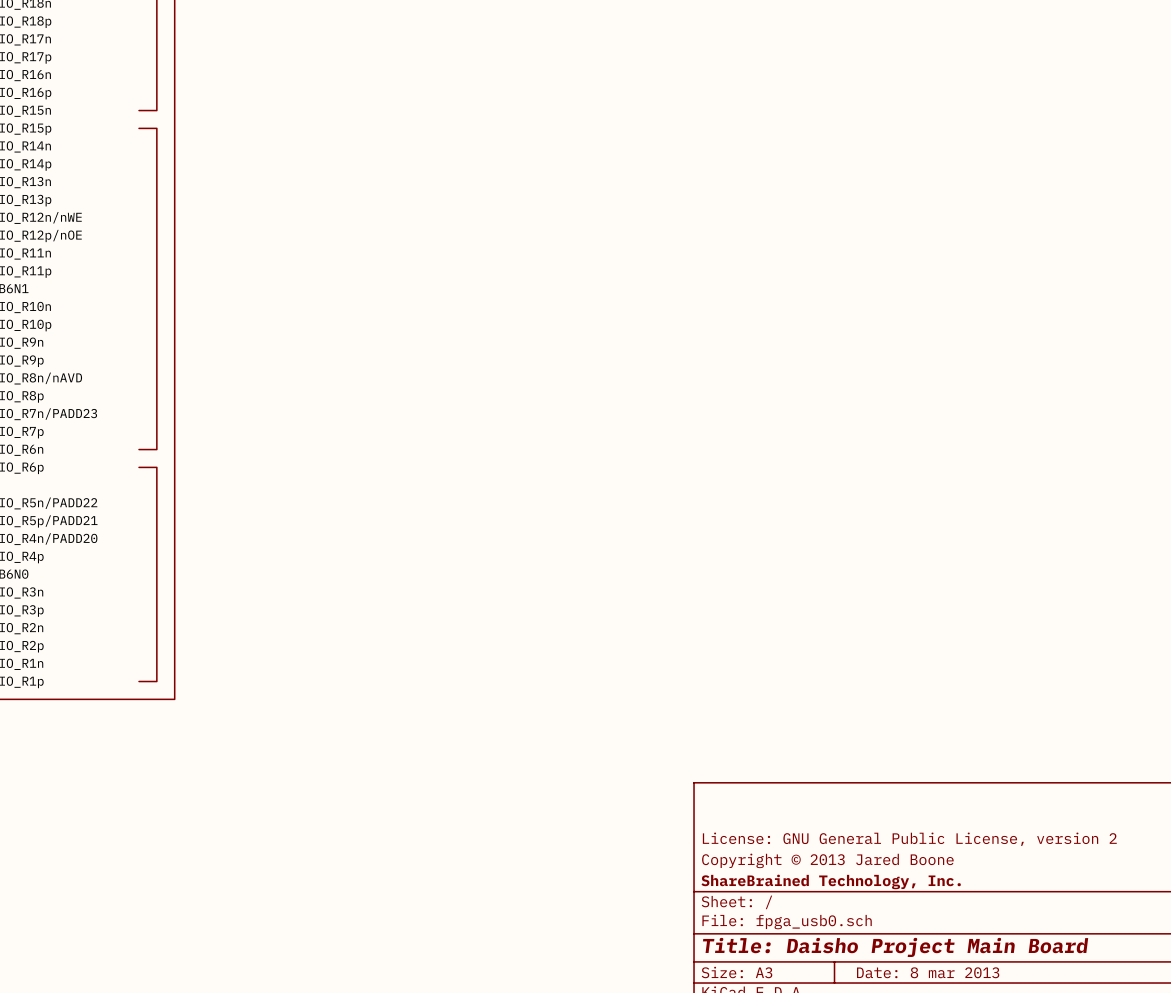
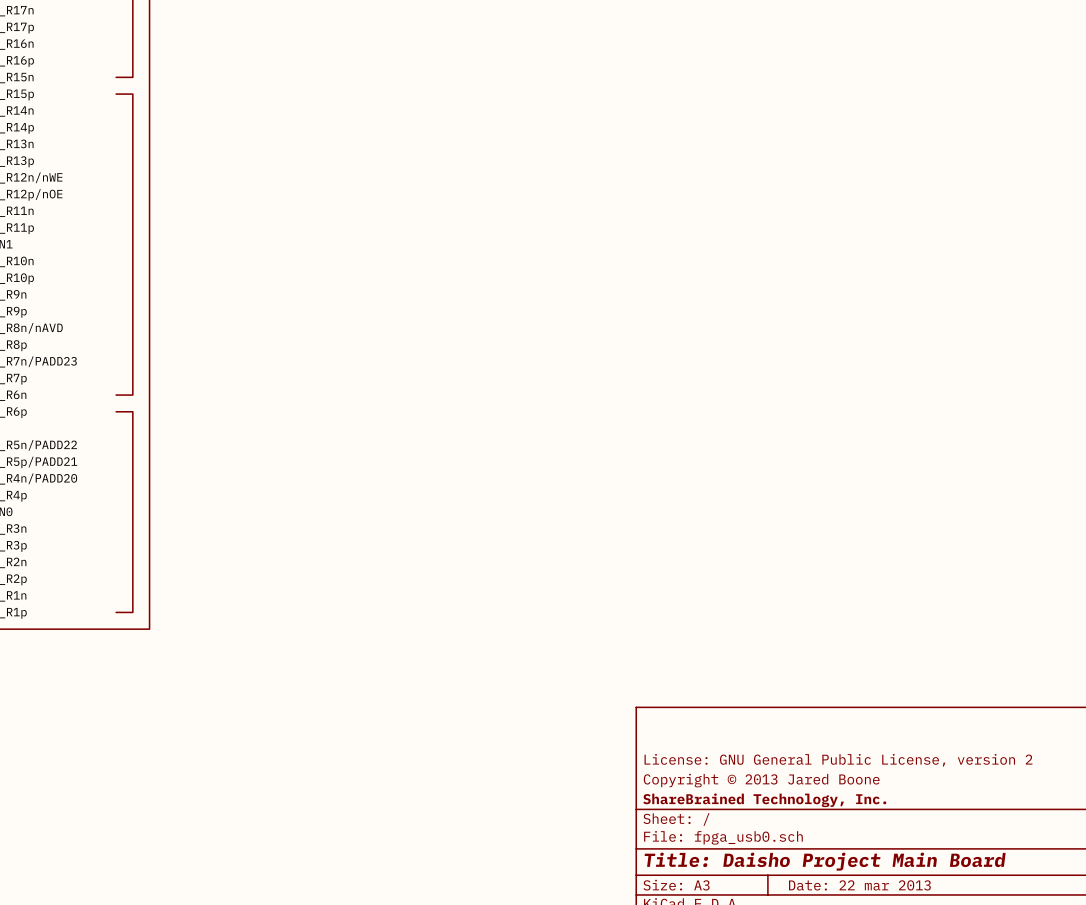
title block: Date: 8 mar 2013 (928, 972) -> Date: 22 mar 2013 (859, 885)

